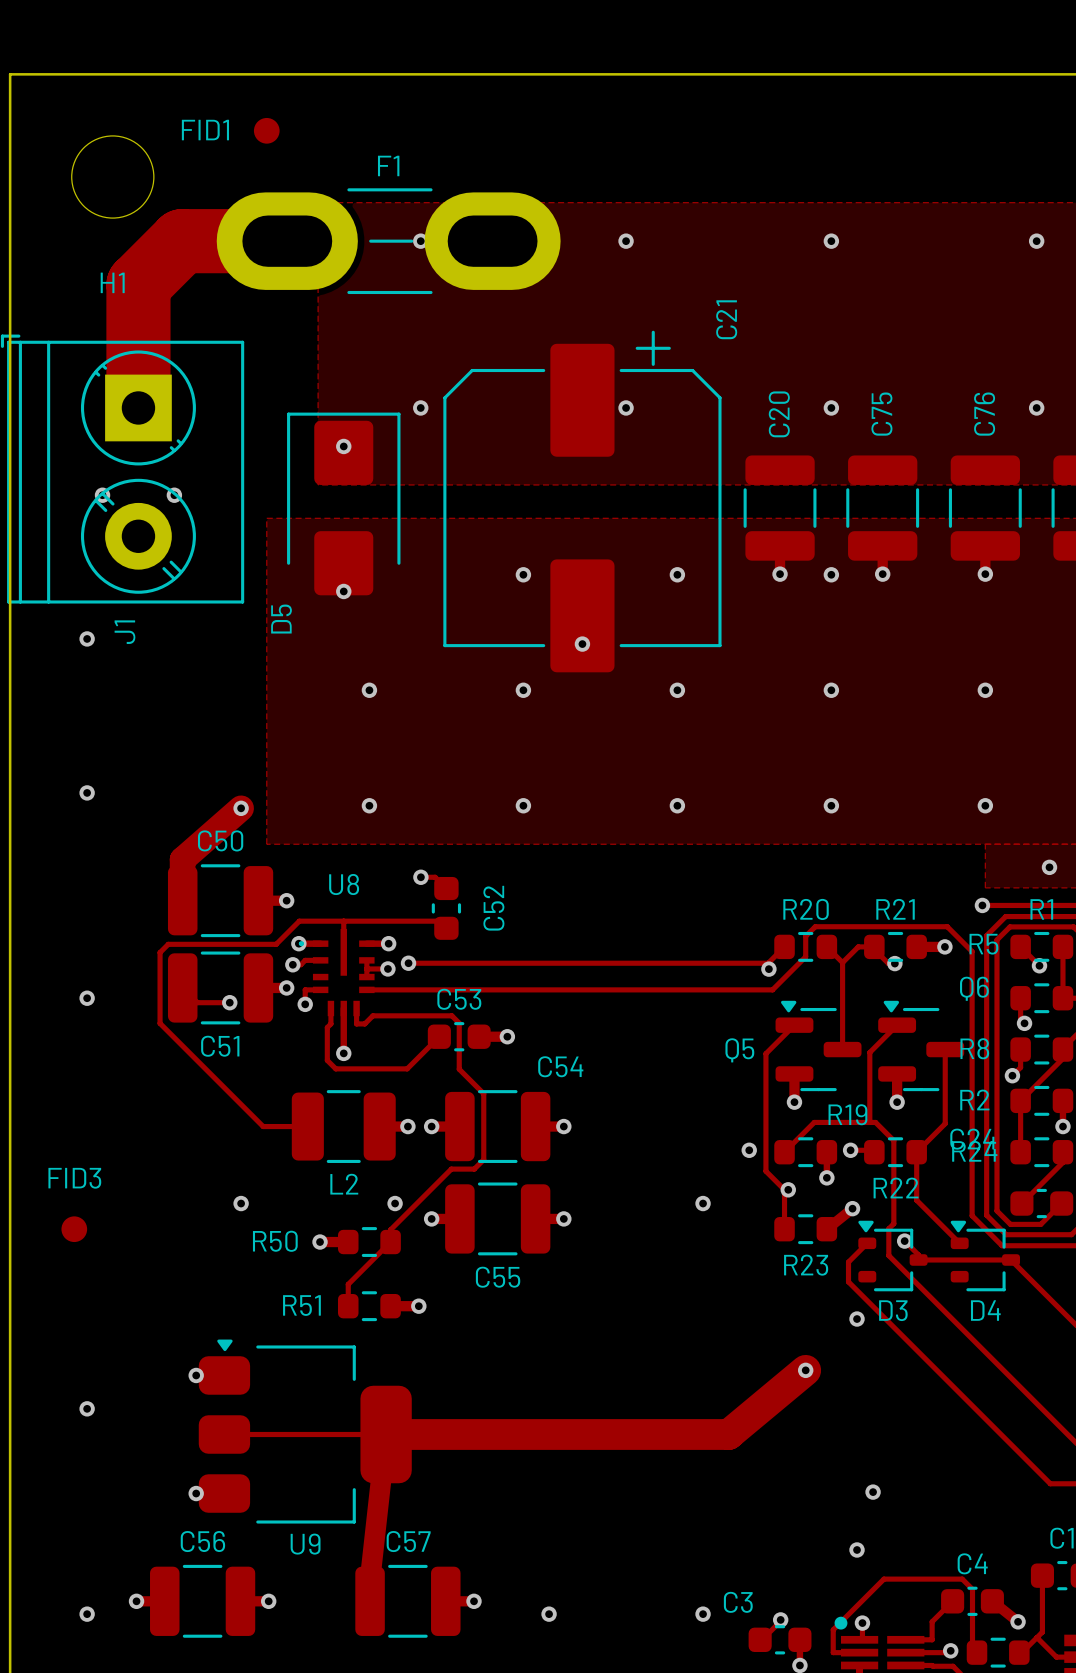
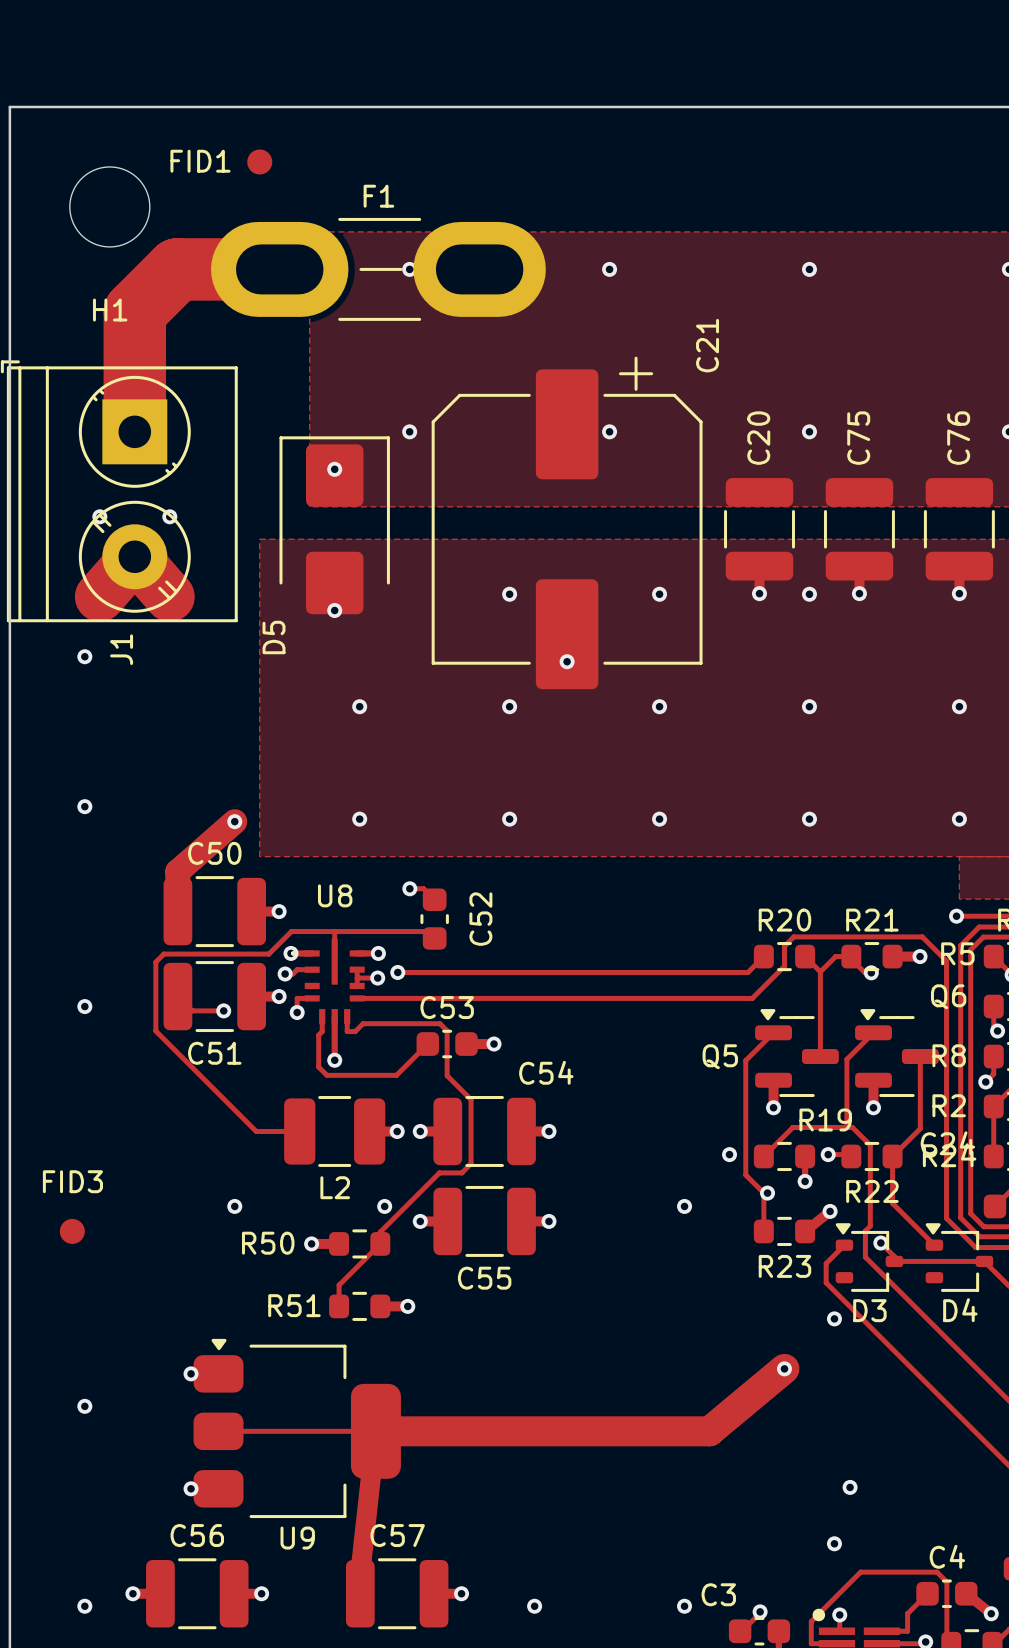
track: none -> (99, 596) (134, 556) (169, 596)
via: (768, 969) -> none

